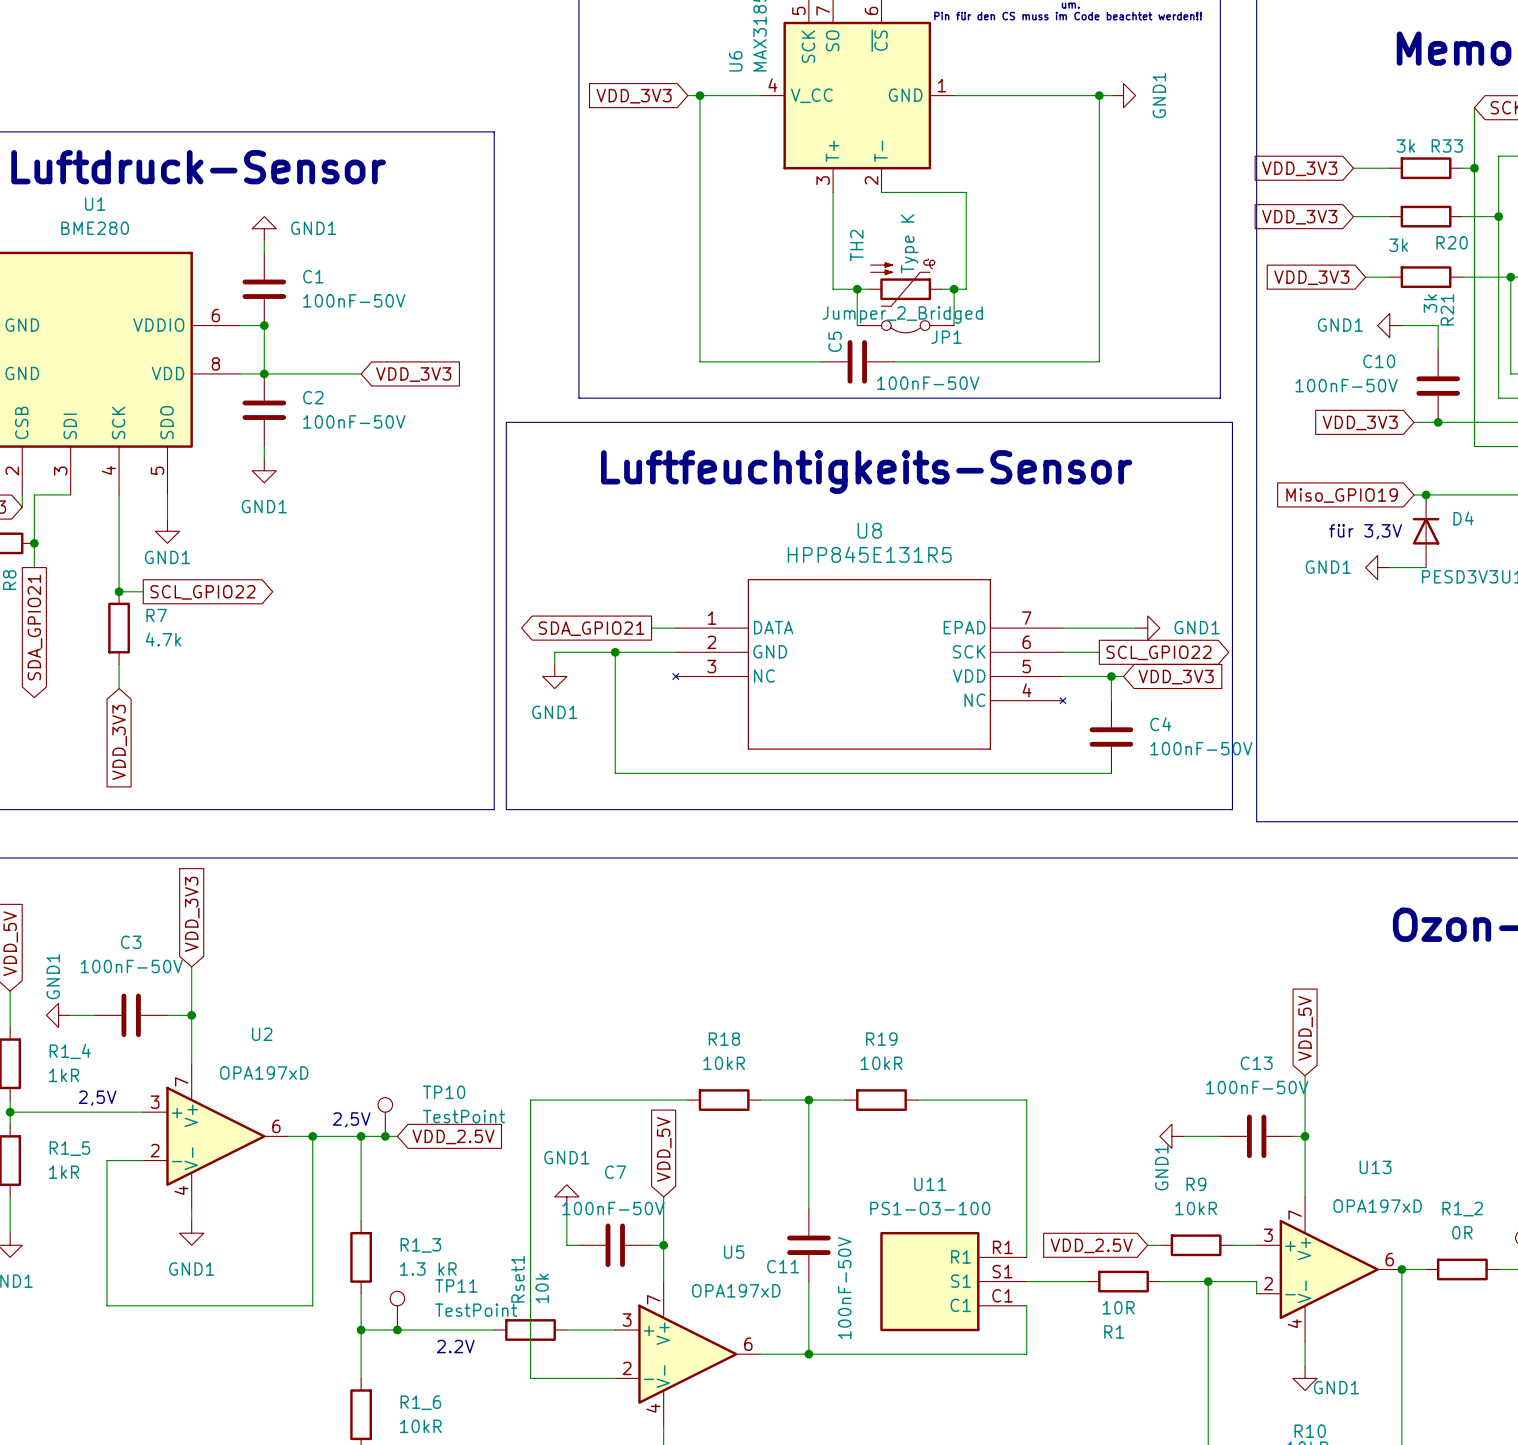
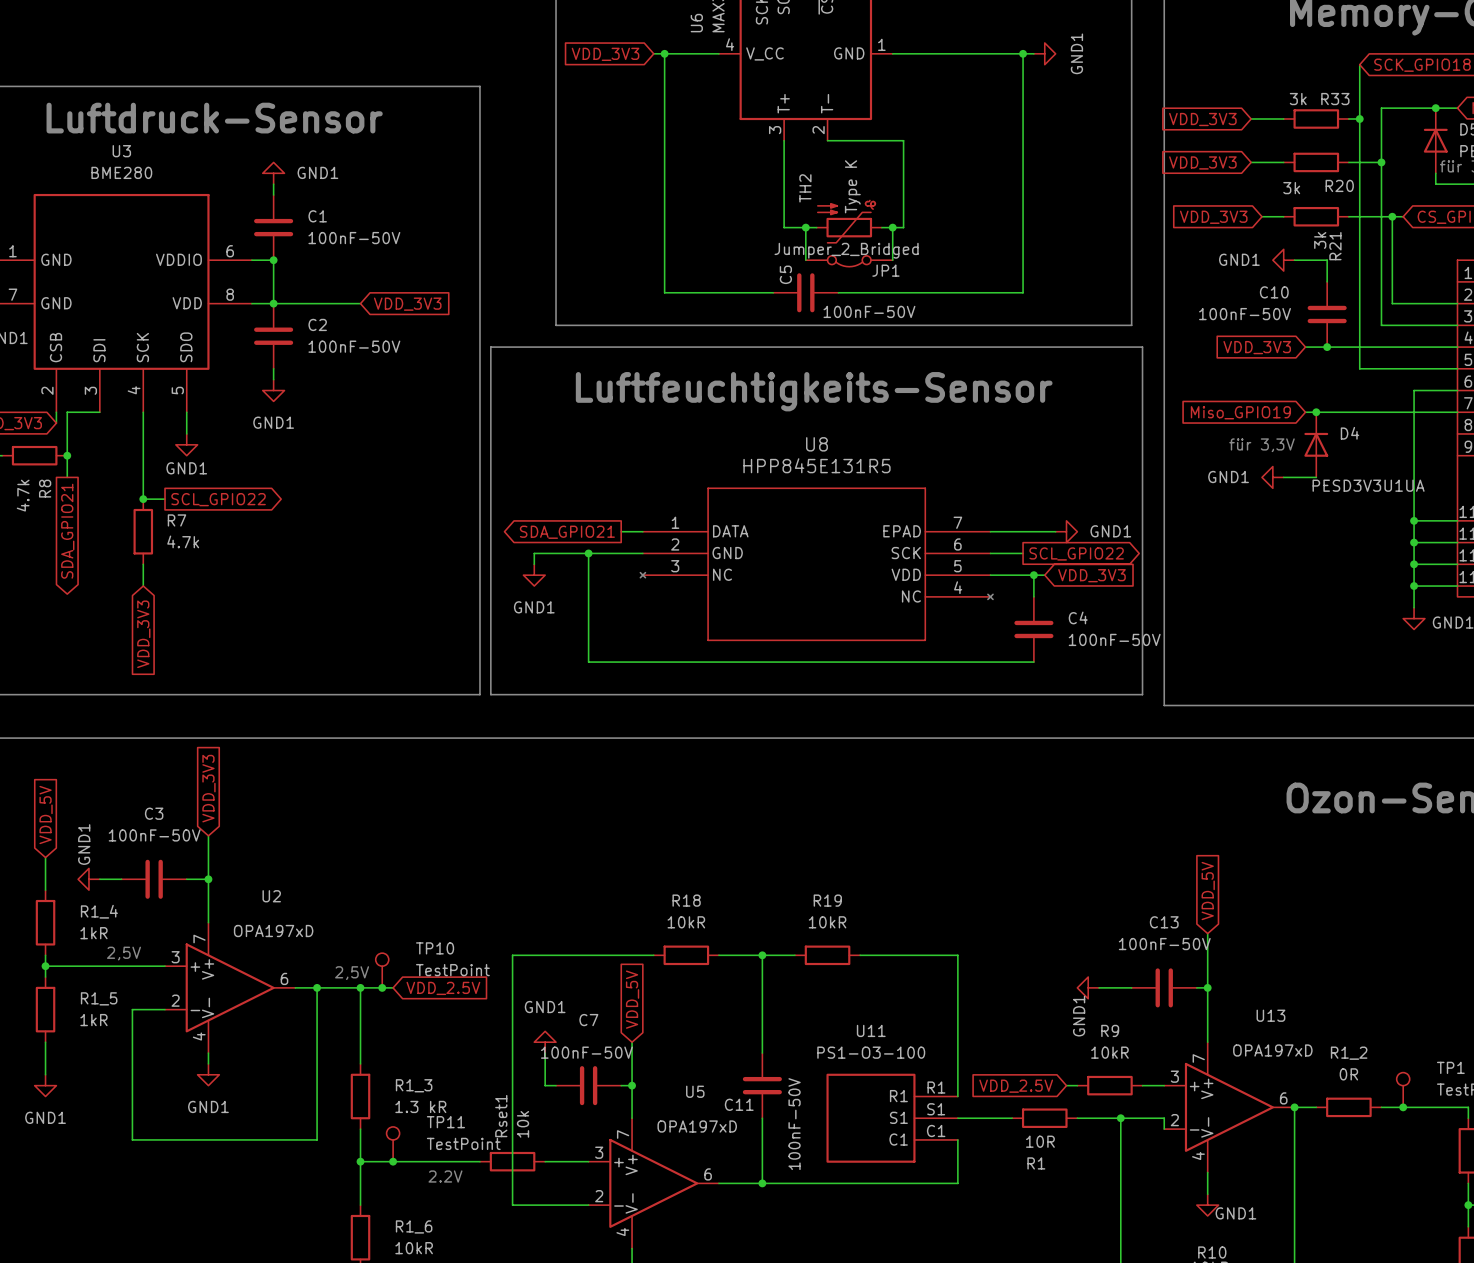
U1 name: U1 (95, 204) -> U3 (121, 151)

